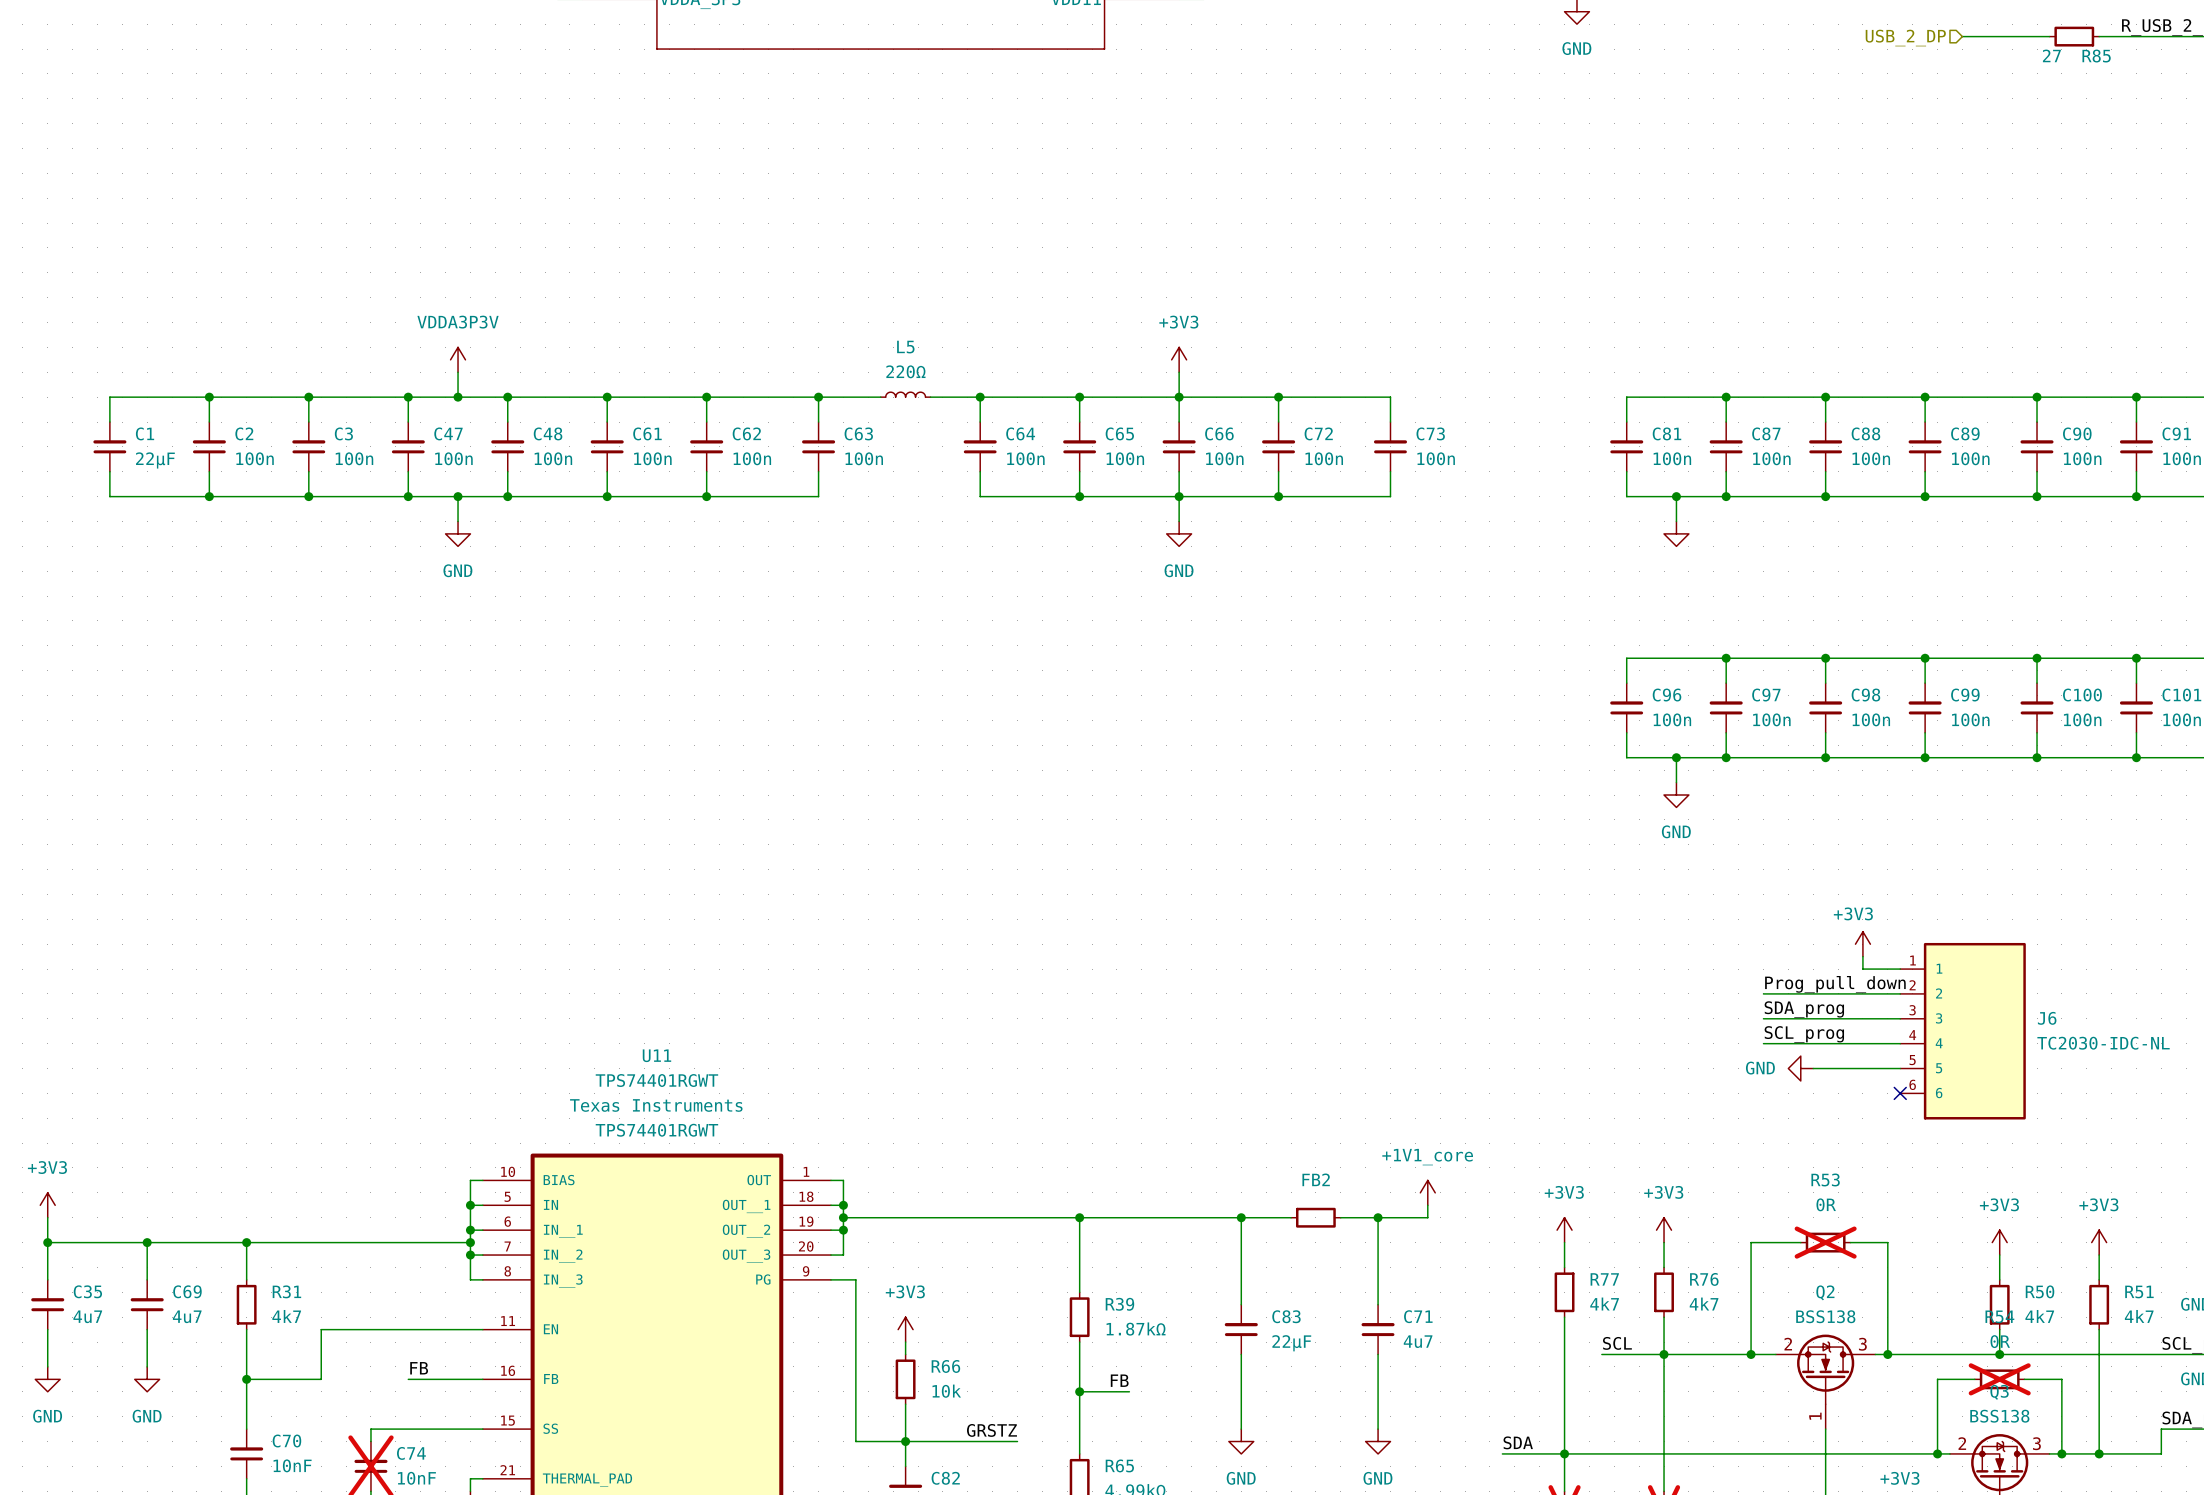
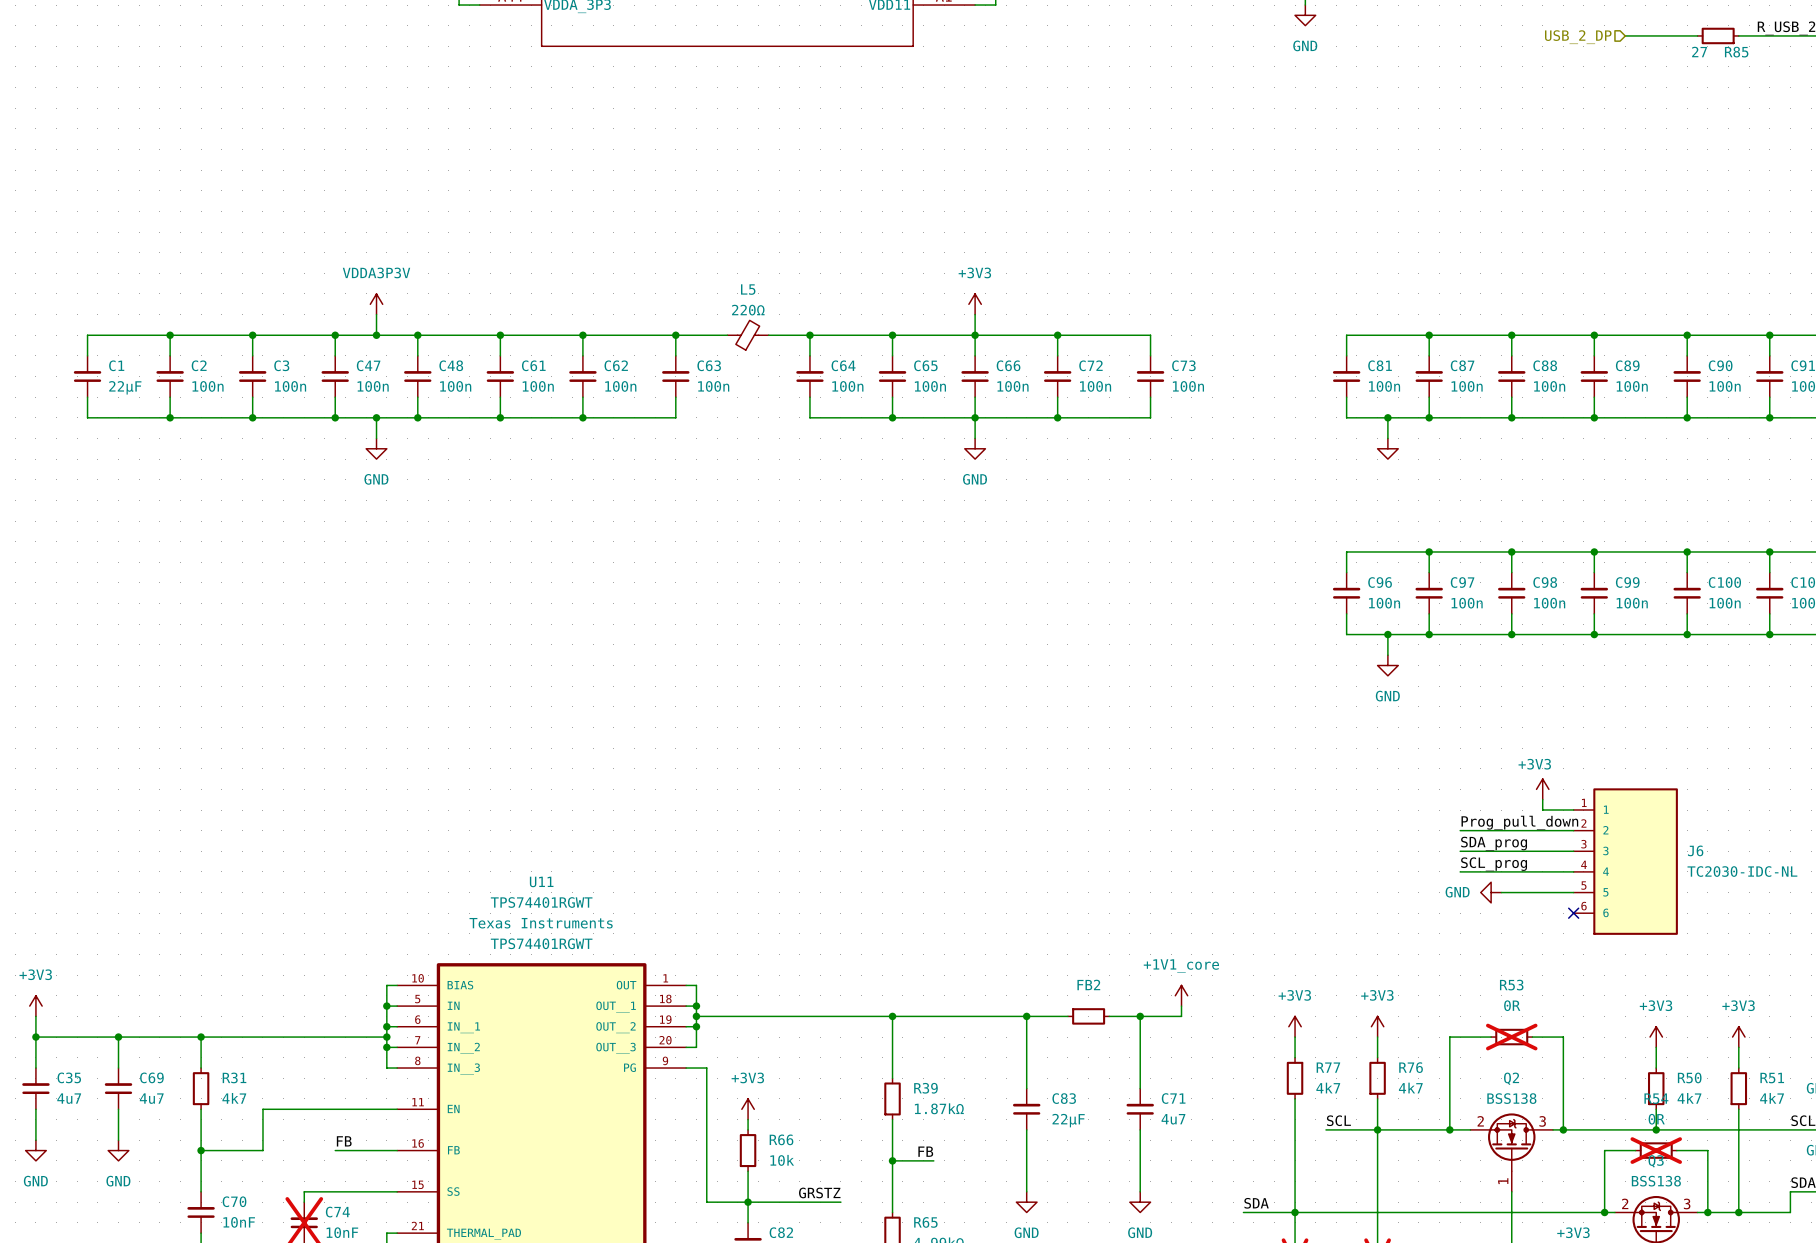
L5 symbol: [880, 392, 931, 398] -> [727, 320, 769, 351]

